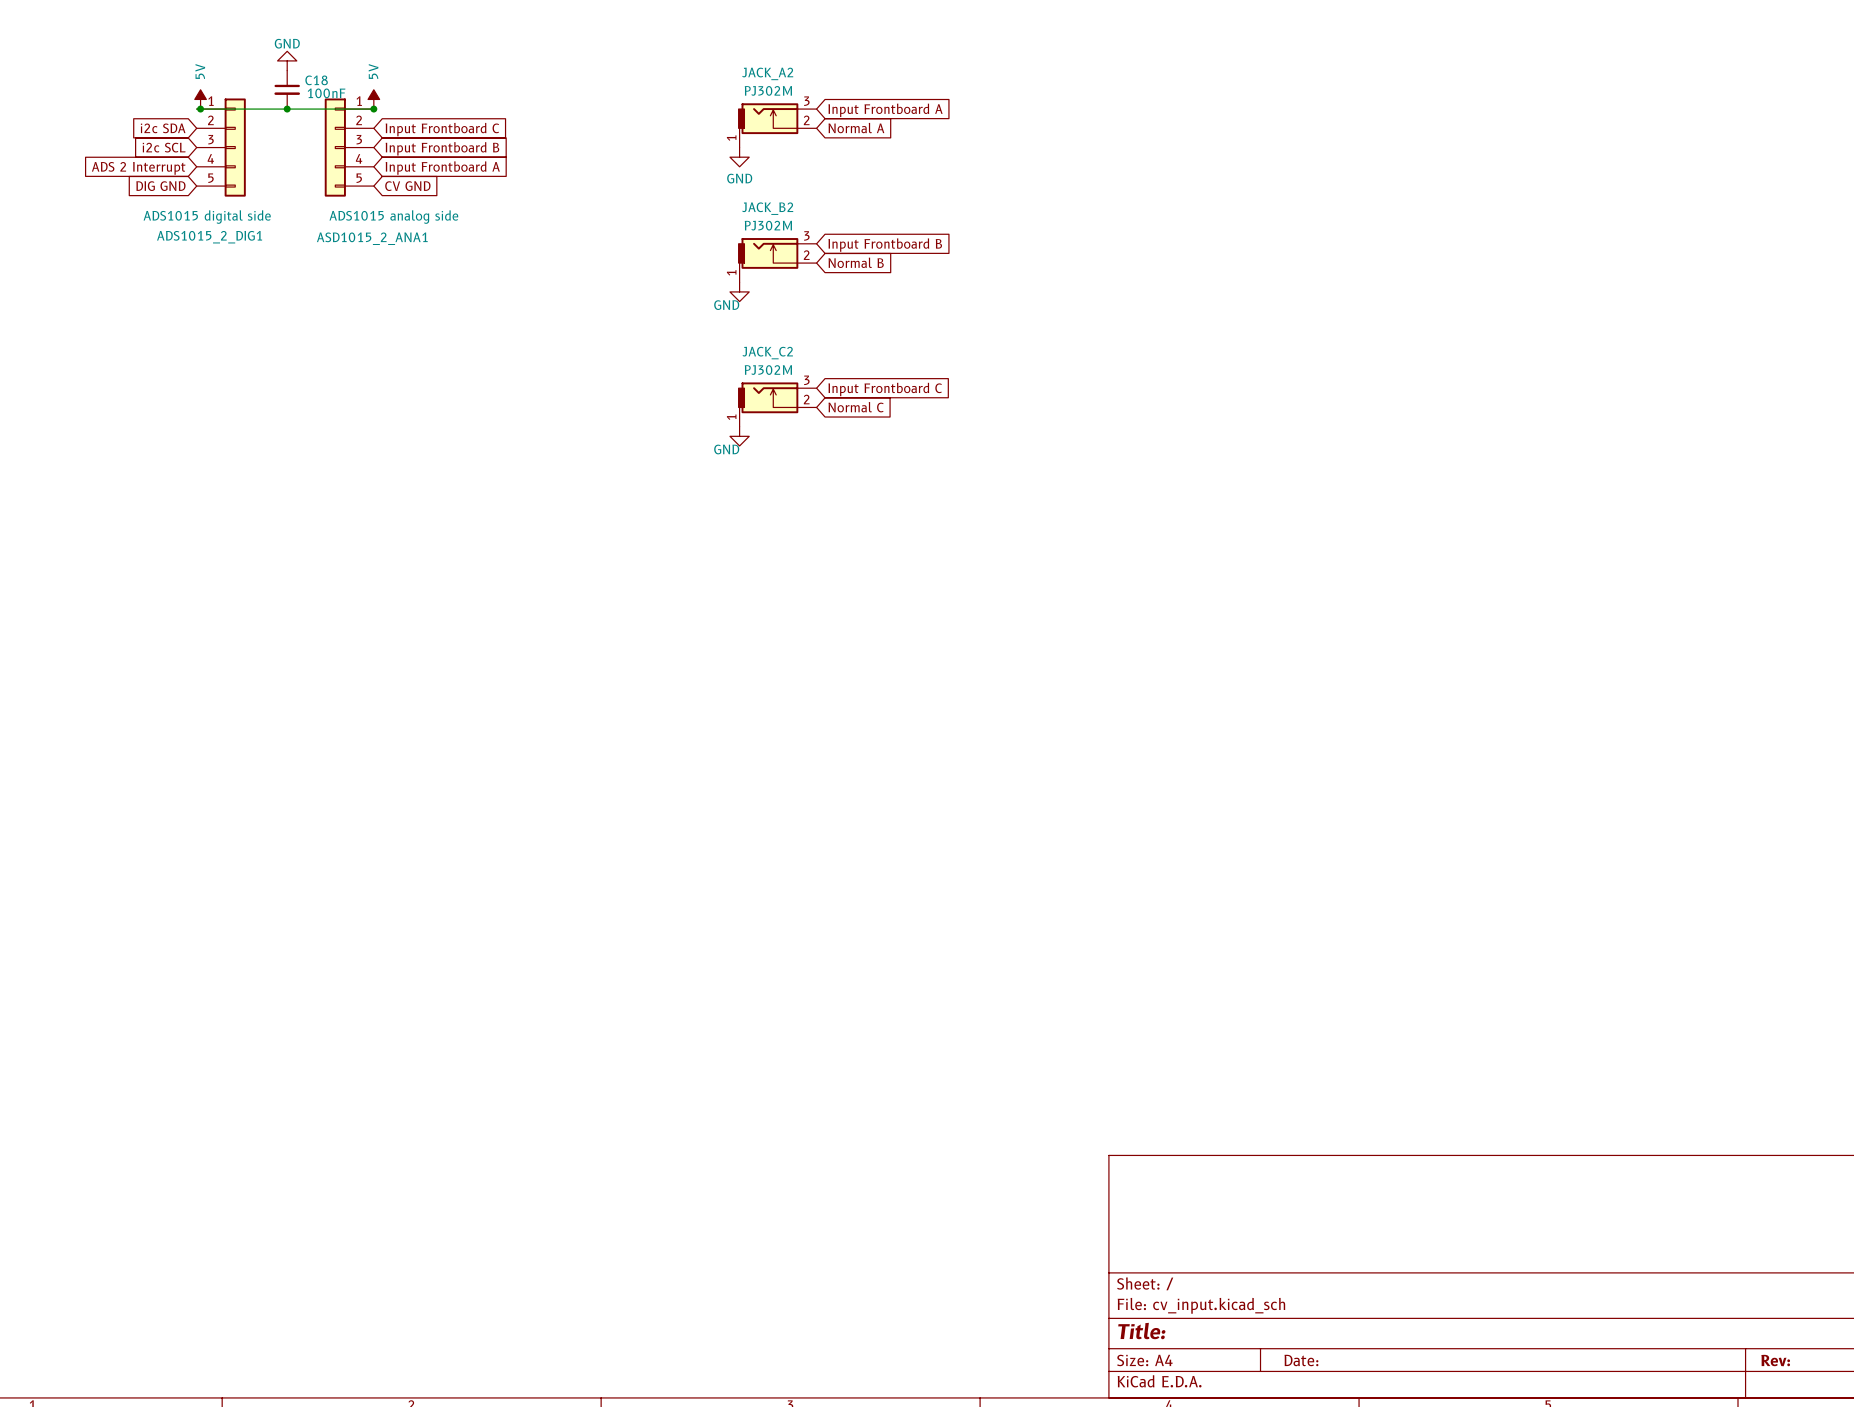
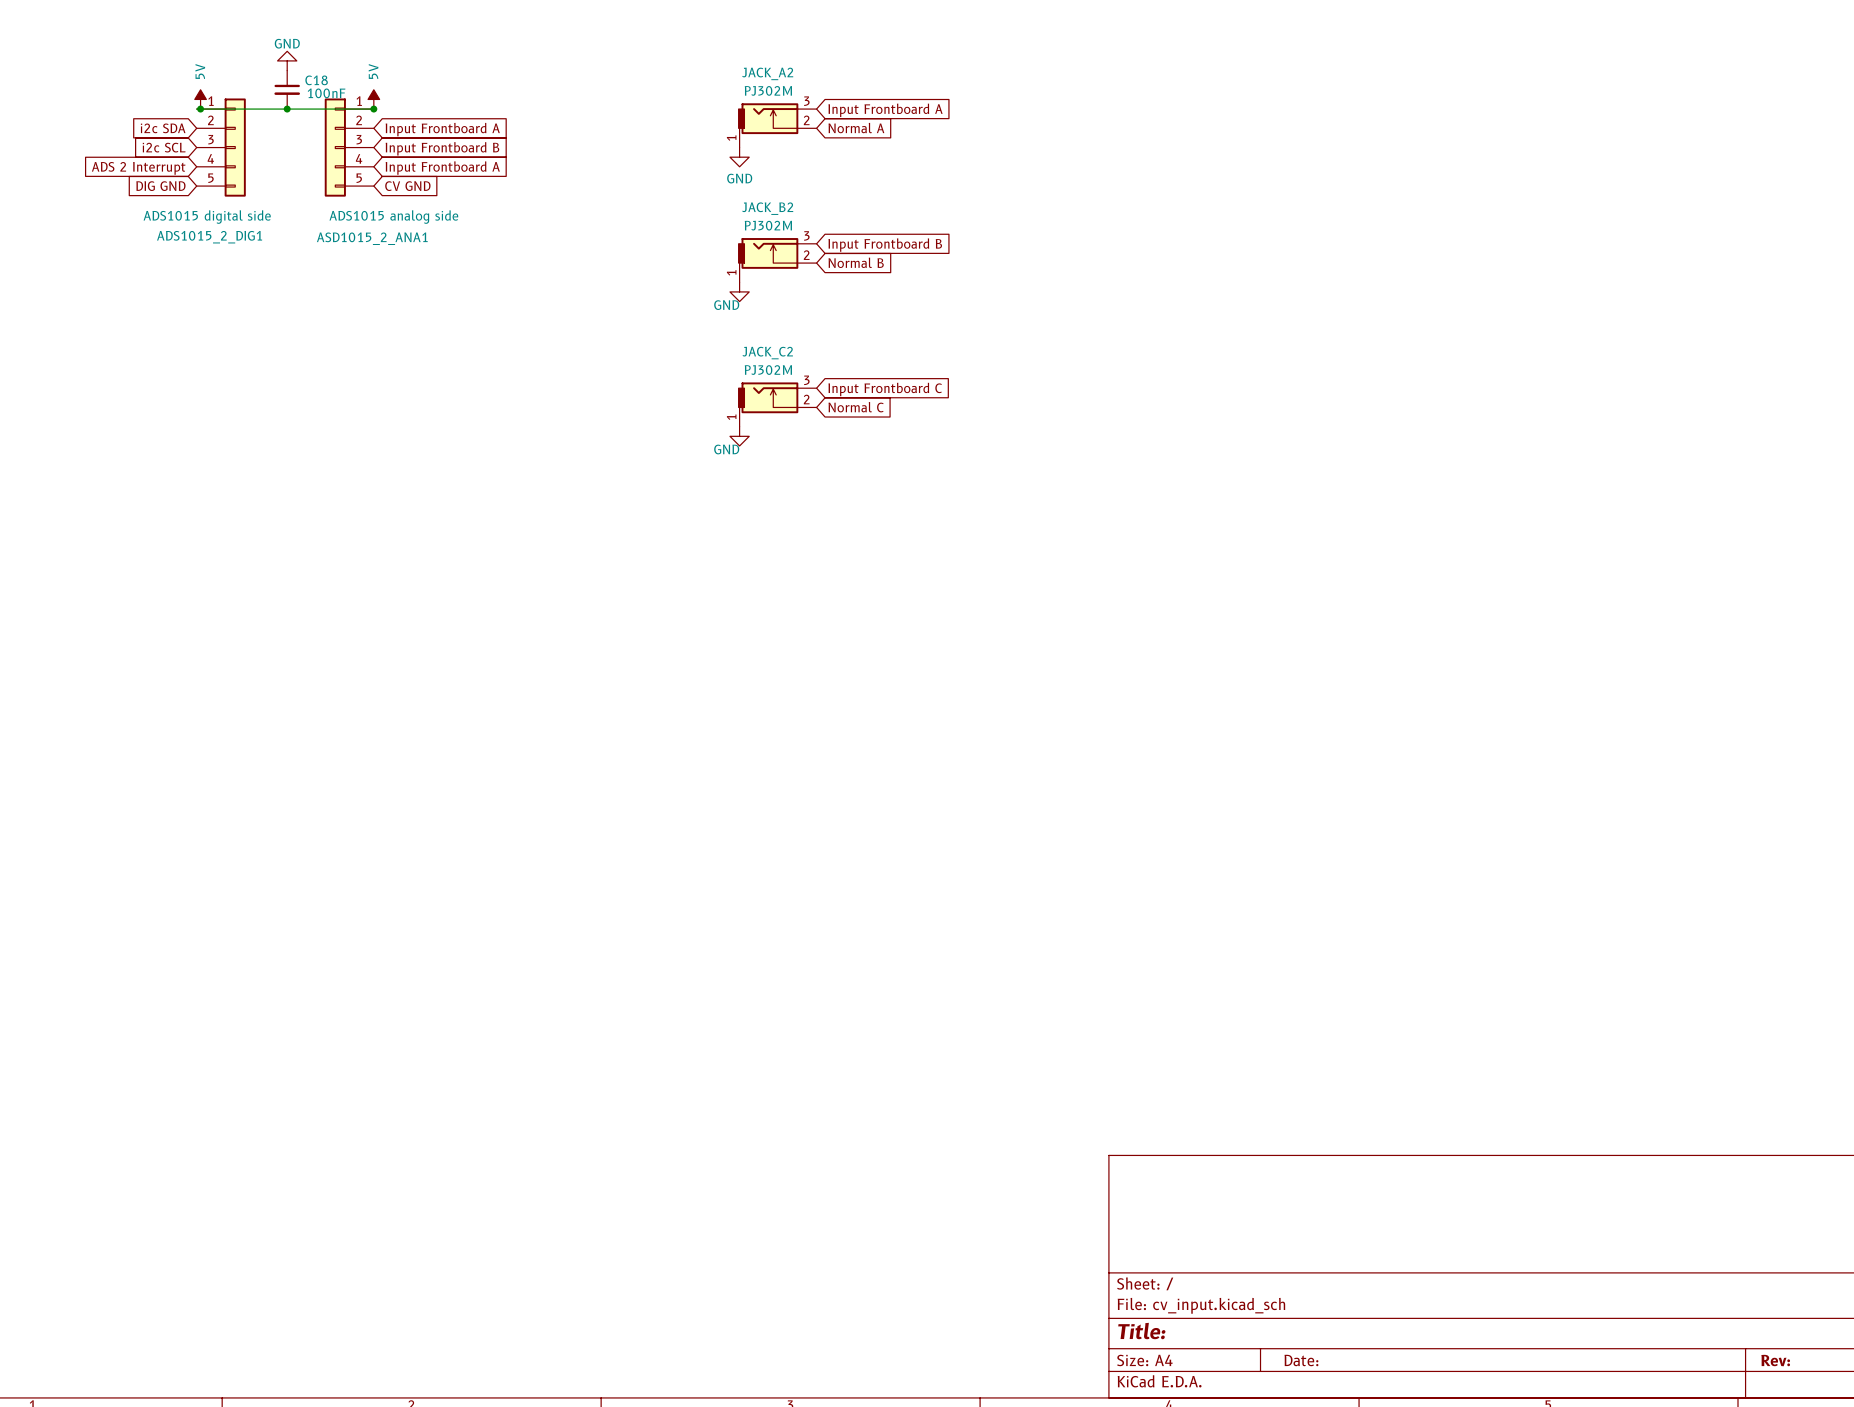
global label: Input Frontboard C (442, 129) -> Input Frontboard A (442, 129)

